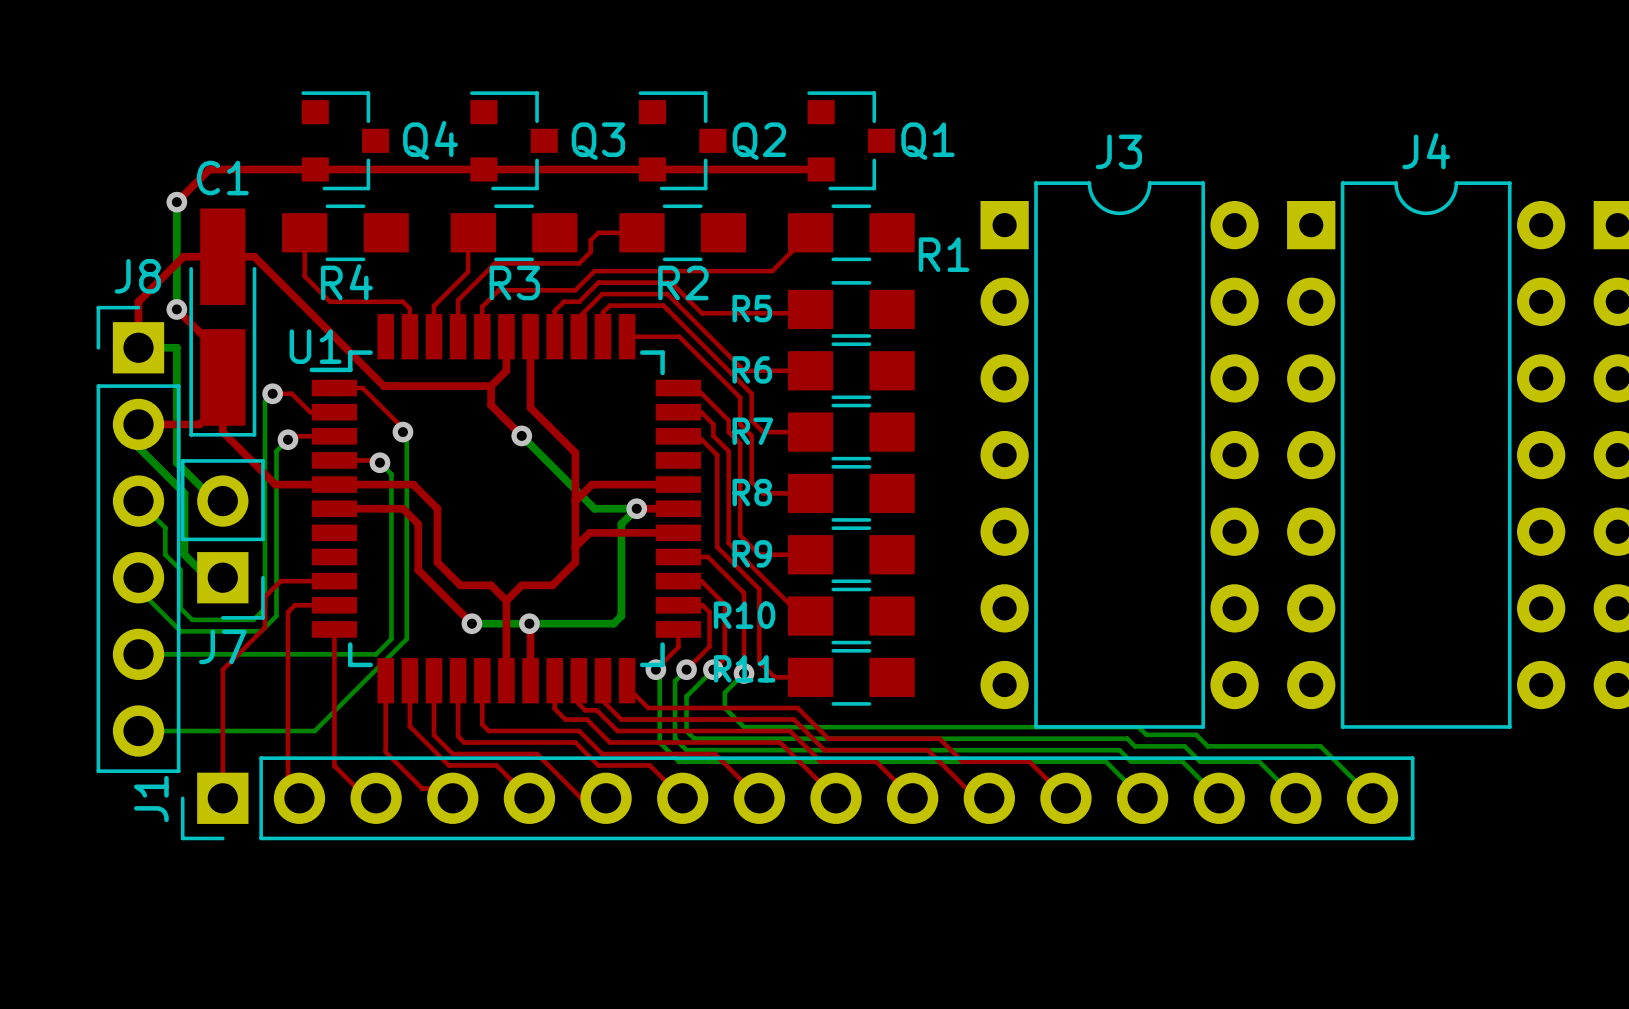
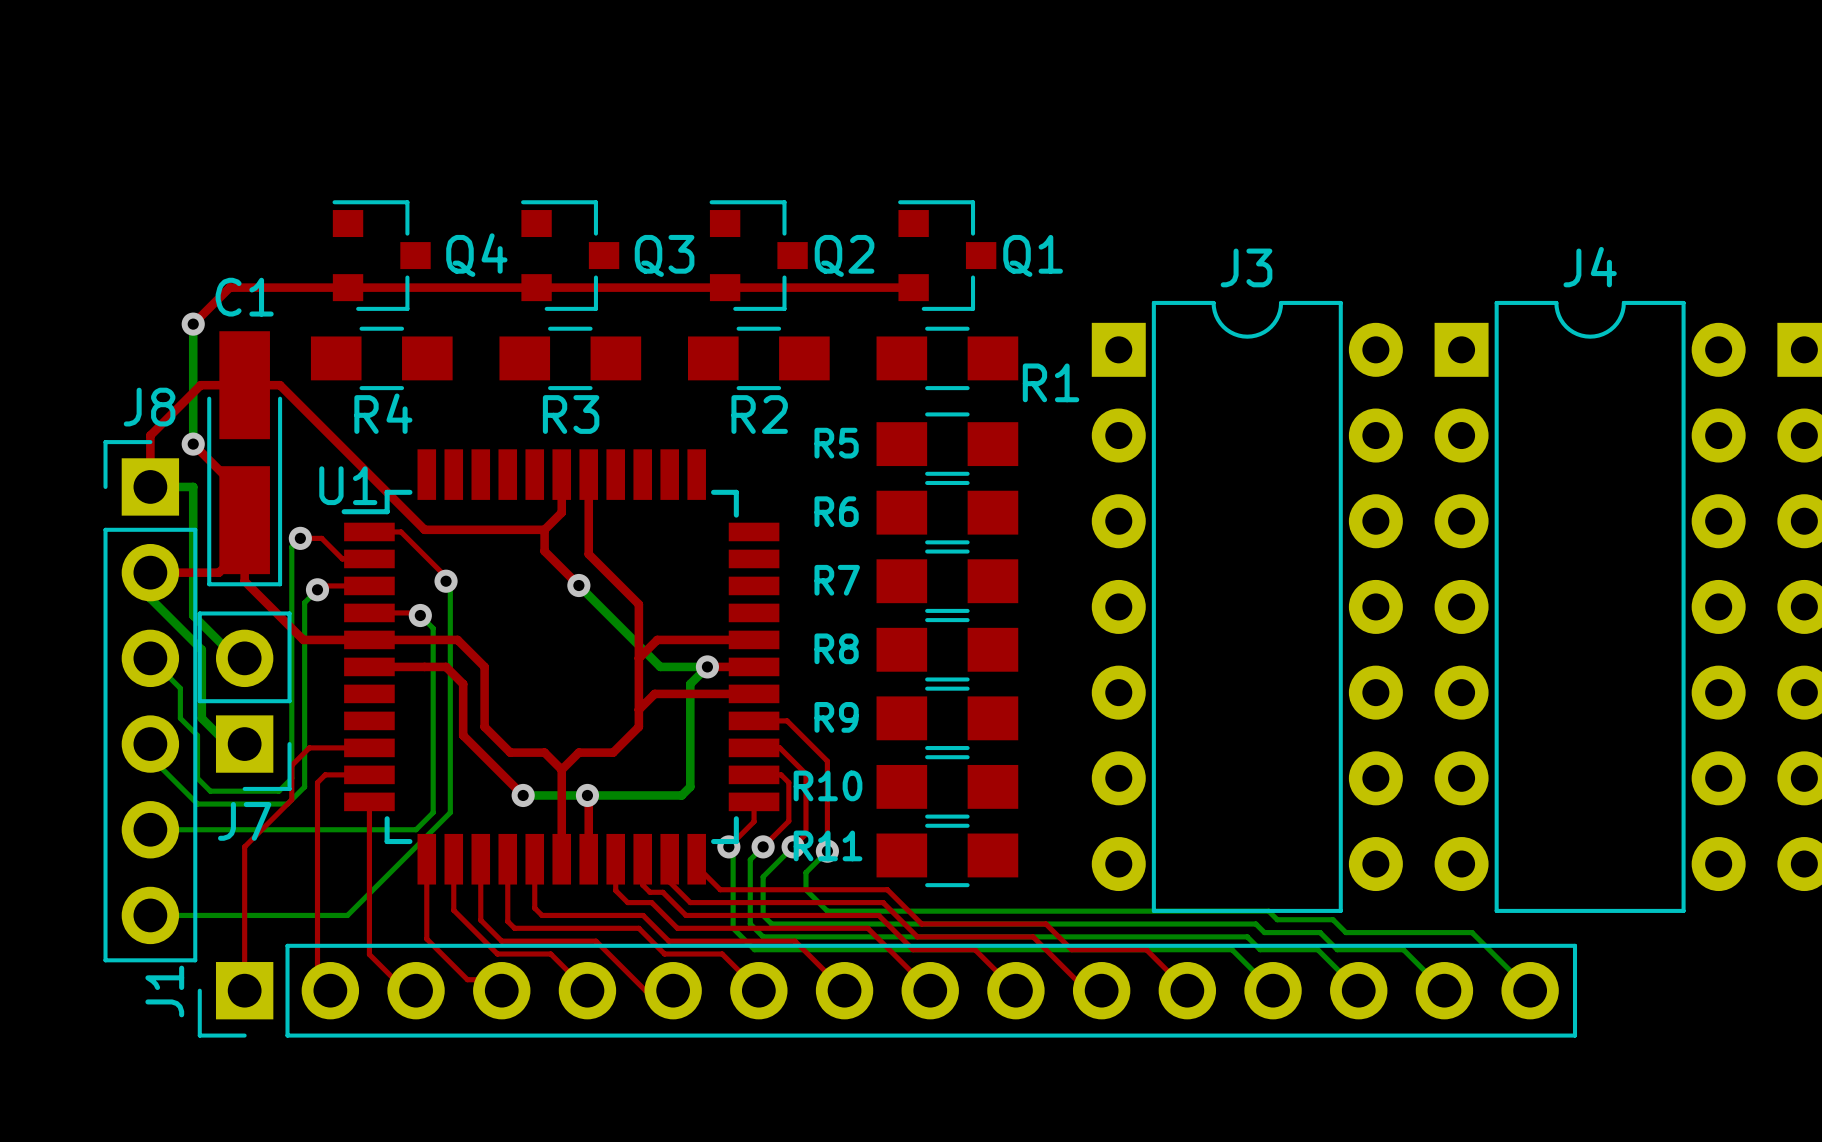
top track: (304, 232) (304, 276) (330, 301) (402, 301) (409, 308) (409, 336) -> none
top track: (473, 232) (468, 238) (468, 271) (434, 306) (434, 336) -> none
top track: (641, 232) (598, 232) (590, 240) (590, 251) (579, 263) (494, 263) (458, 300) (458, 336) -> none
top track: (810, 232) (772, 271) (594, 271) (575, 290) (498, 290) (482, 306) (482, 336) -> none
top track: (810, 309) (806, 313) (701, 313) (671, 282) (598, 282) (579, 301) (563, 301) (554, 310) (554, 336) -> none
top track: (578, 336) (578, 317) (602, 294) (667, 294) (744, 370) (810, 370) -> none
top track: (602, 336) (602, 312) (609, 305) (663, 305) (751, 393) (751, 420) (763, 432) (810, 432) -> none
top track: (627, 336) (679, 336) (740, 397) (740, 424) (751, 435) (751, 481) (763, 493) (810, 493) -> none
top track: (678, 388) (696, 388) (728, 420) (728, 432) (740, 443) (740, 535) (759, 554) (810, 554) -> none
top track: (678, 412) (701, 412) (713, 424) (713, 435) (728, 451) (728, 543) (801, 616) (810, 616) -> none
top track: (678, 436) (698, 436) (717, 455) (717, 547) (759, 589) (759, 662) (774, 677) (810, 677) -> none

